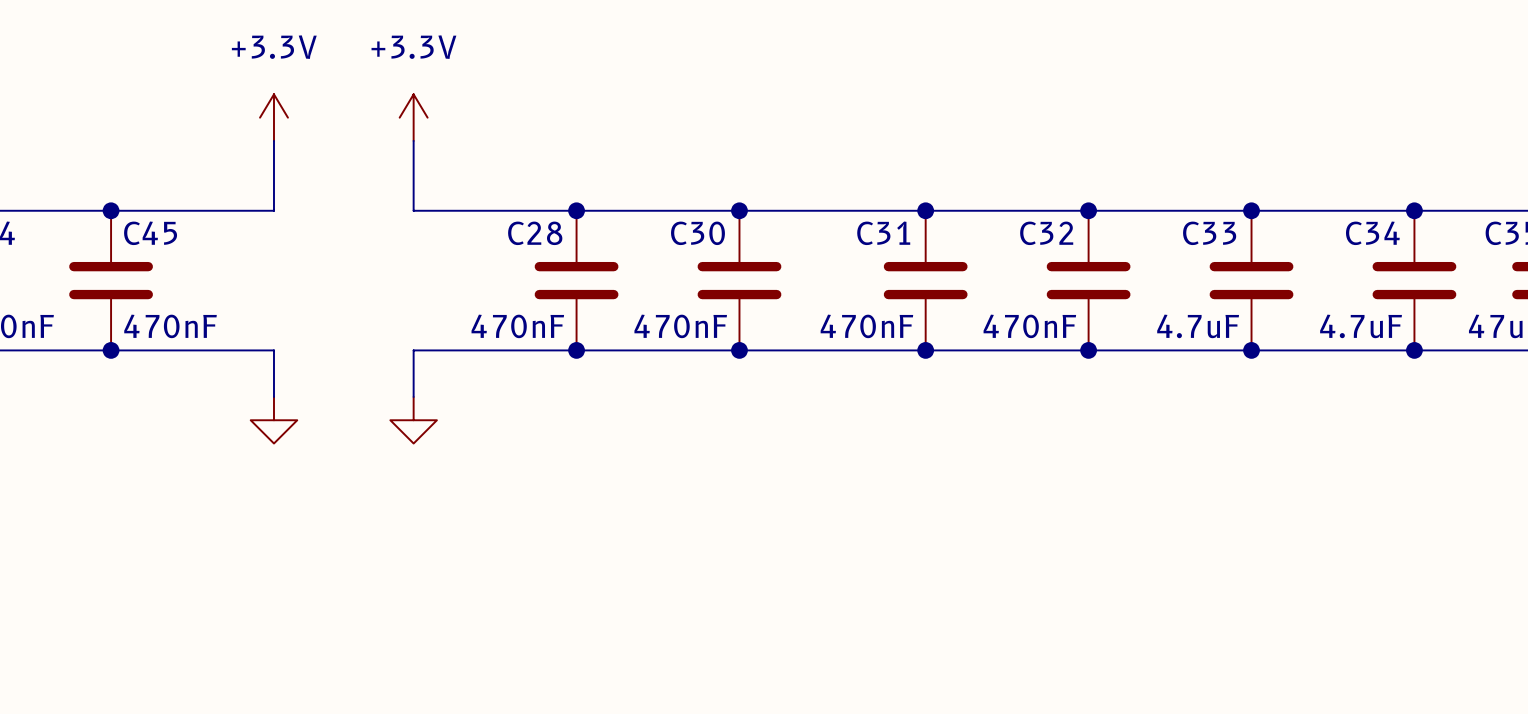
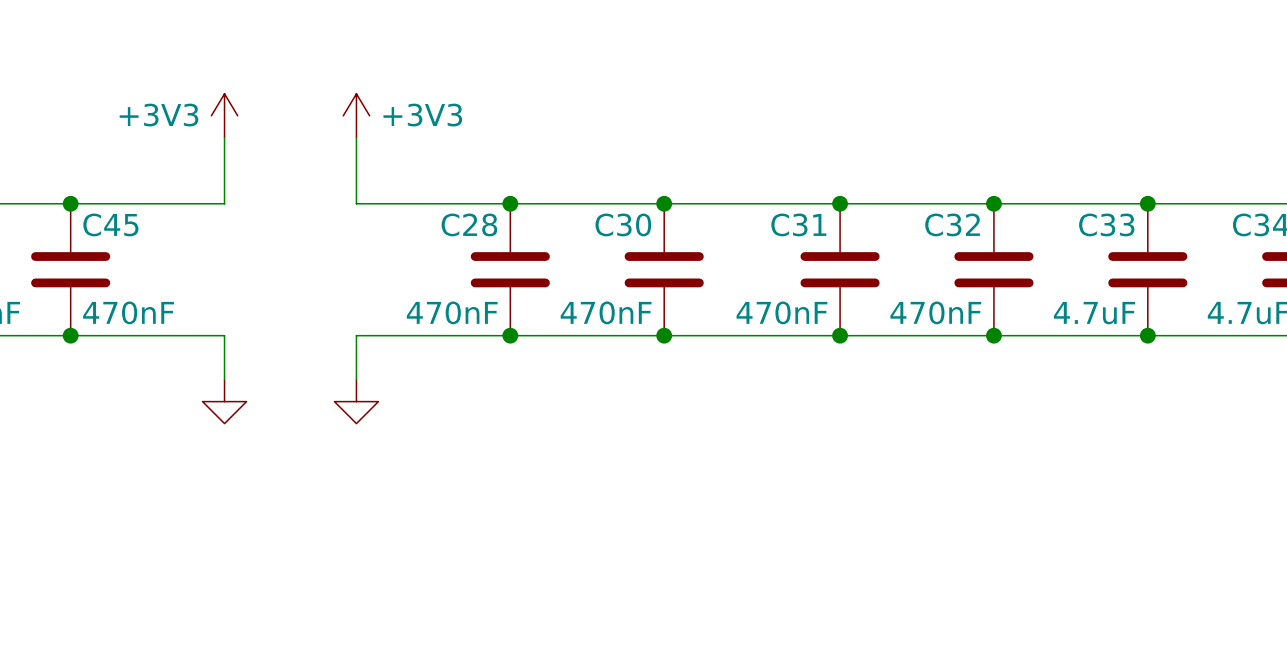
power symbol: +3.3V (273, 117) -> +3V3 (224, 115)
power symbol: +3.3V (413, 117) -> +3V3 (356, 115)

